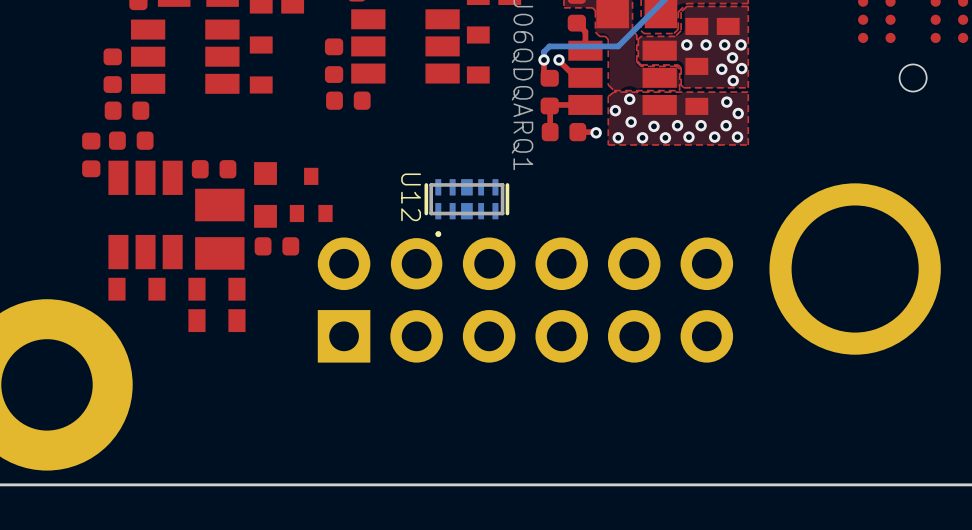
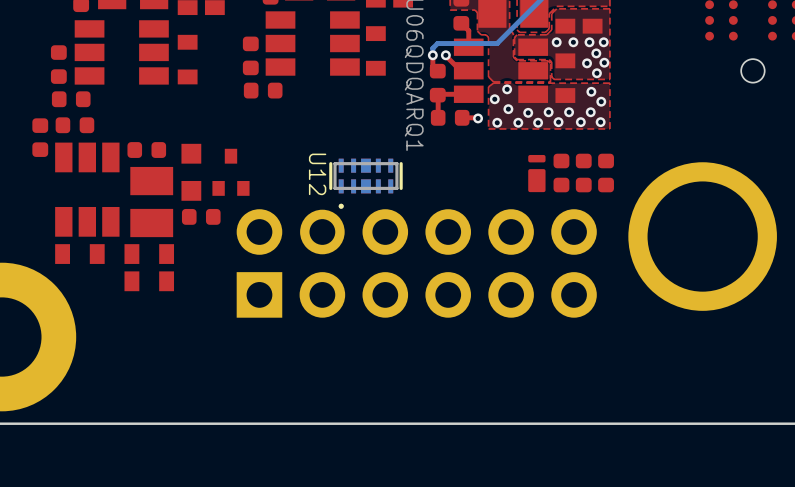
part: none -> (561, 173)
part: none -> (583, 173)
part: none -> (606, 173)
part: none -> (536, 173)

